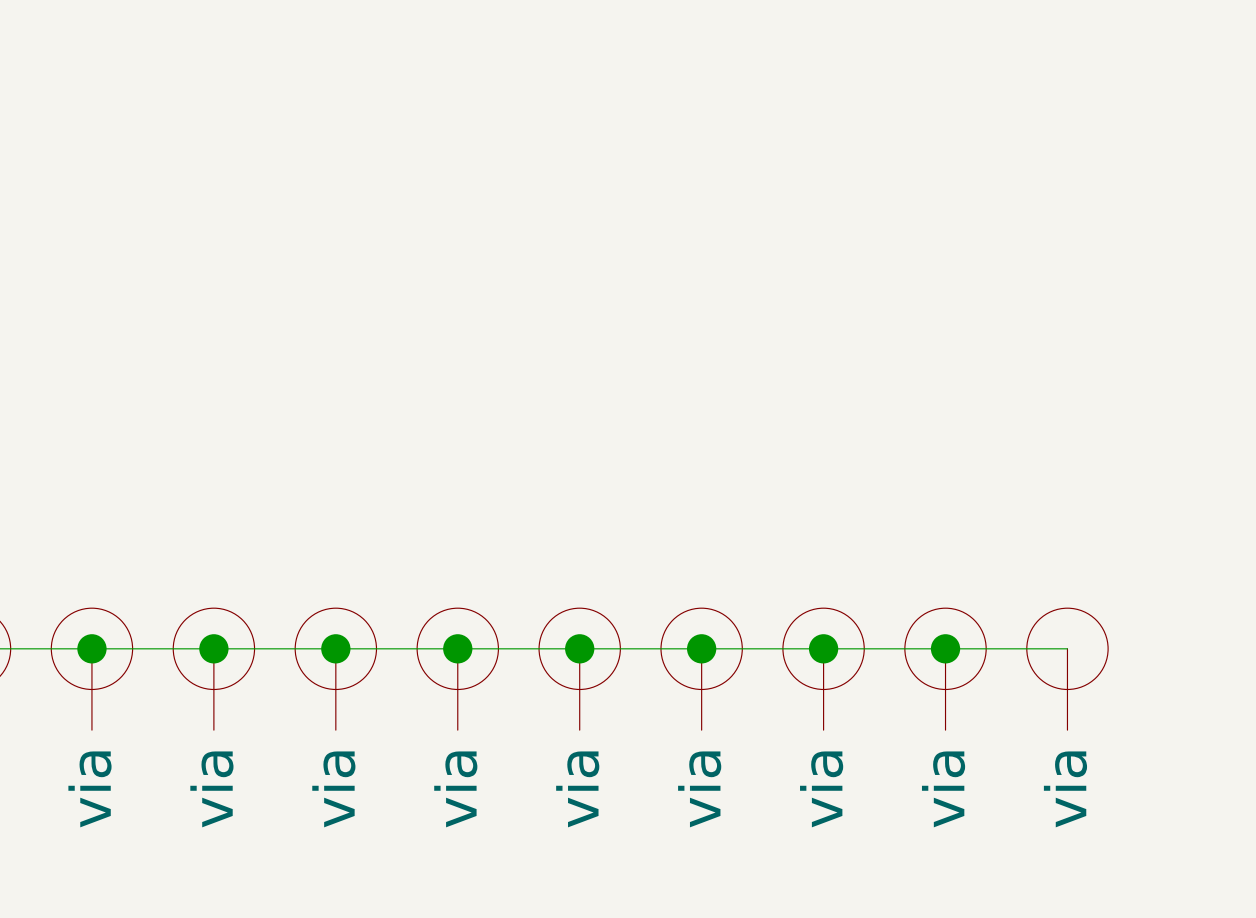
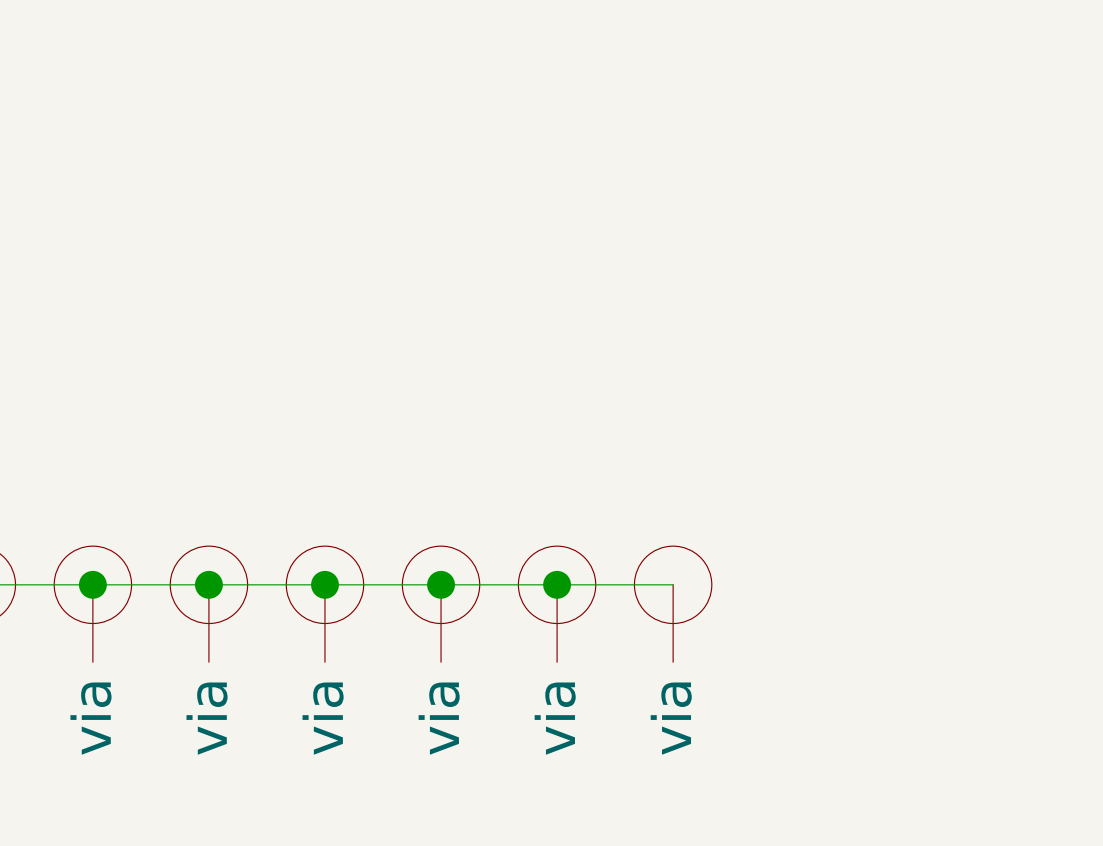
wire: (701, 648) (1067, 648) -> none
junction: (701, 648) -> none
junction: (823, 648) -> none
junction: (945, 648) -> none
part: (823, 669) -> none
part: (945, 669) -> none
part: (1067, 669) -> none

